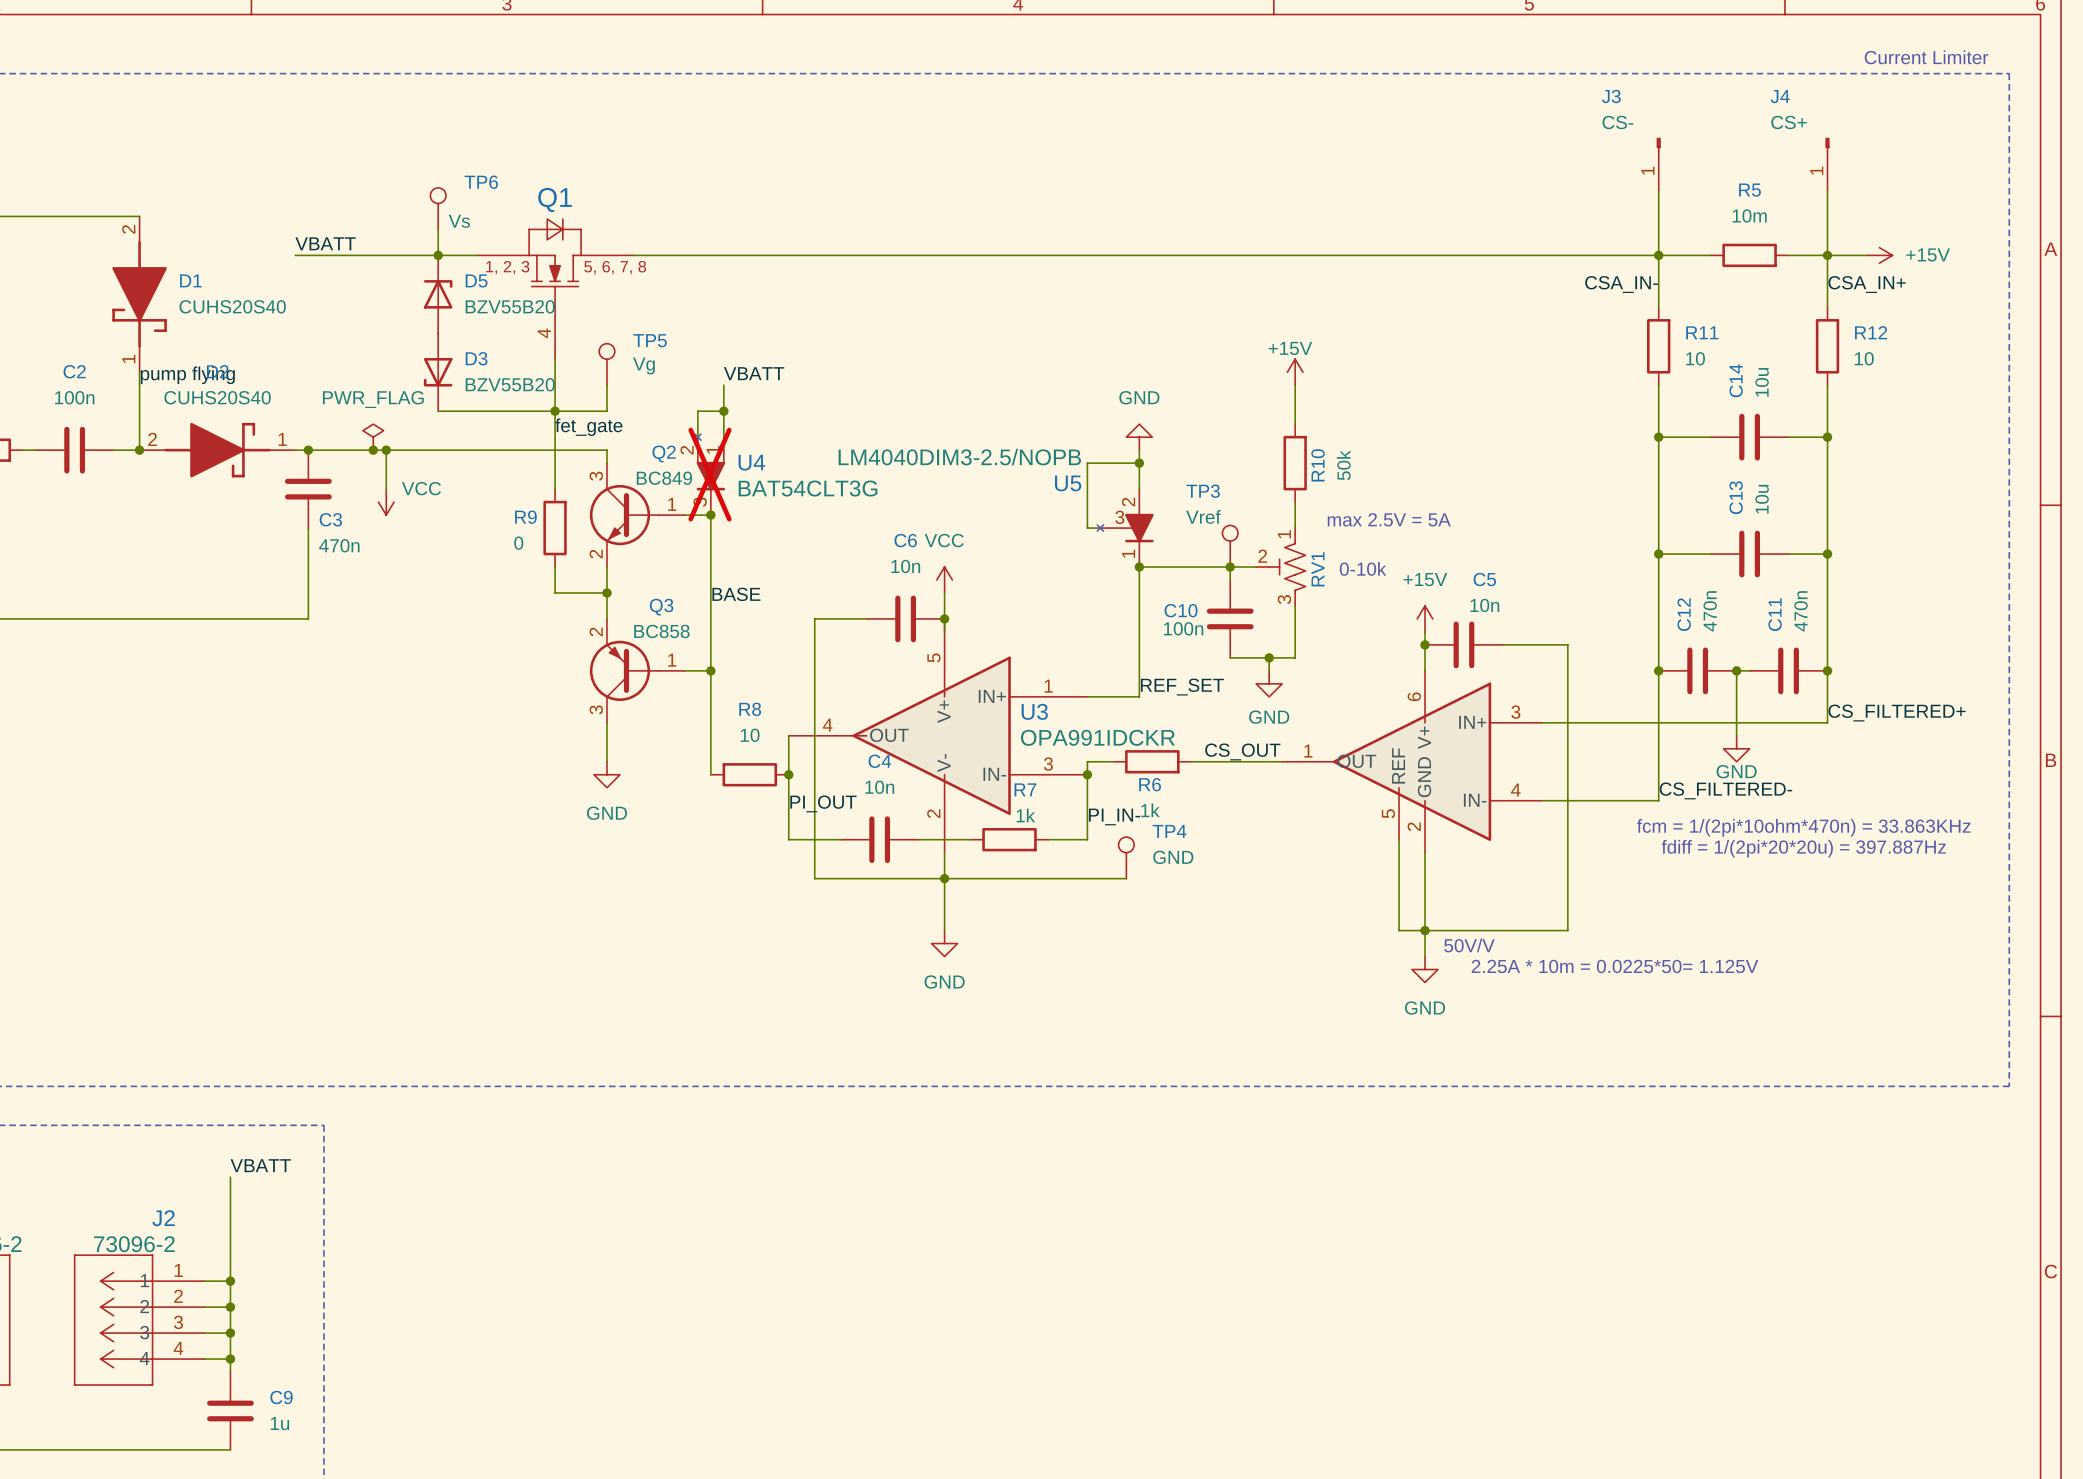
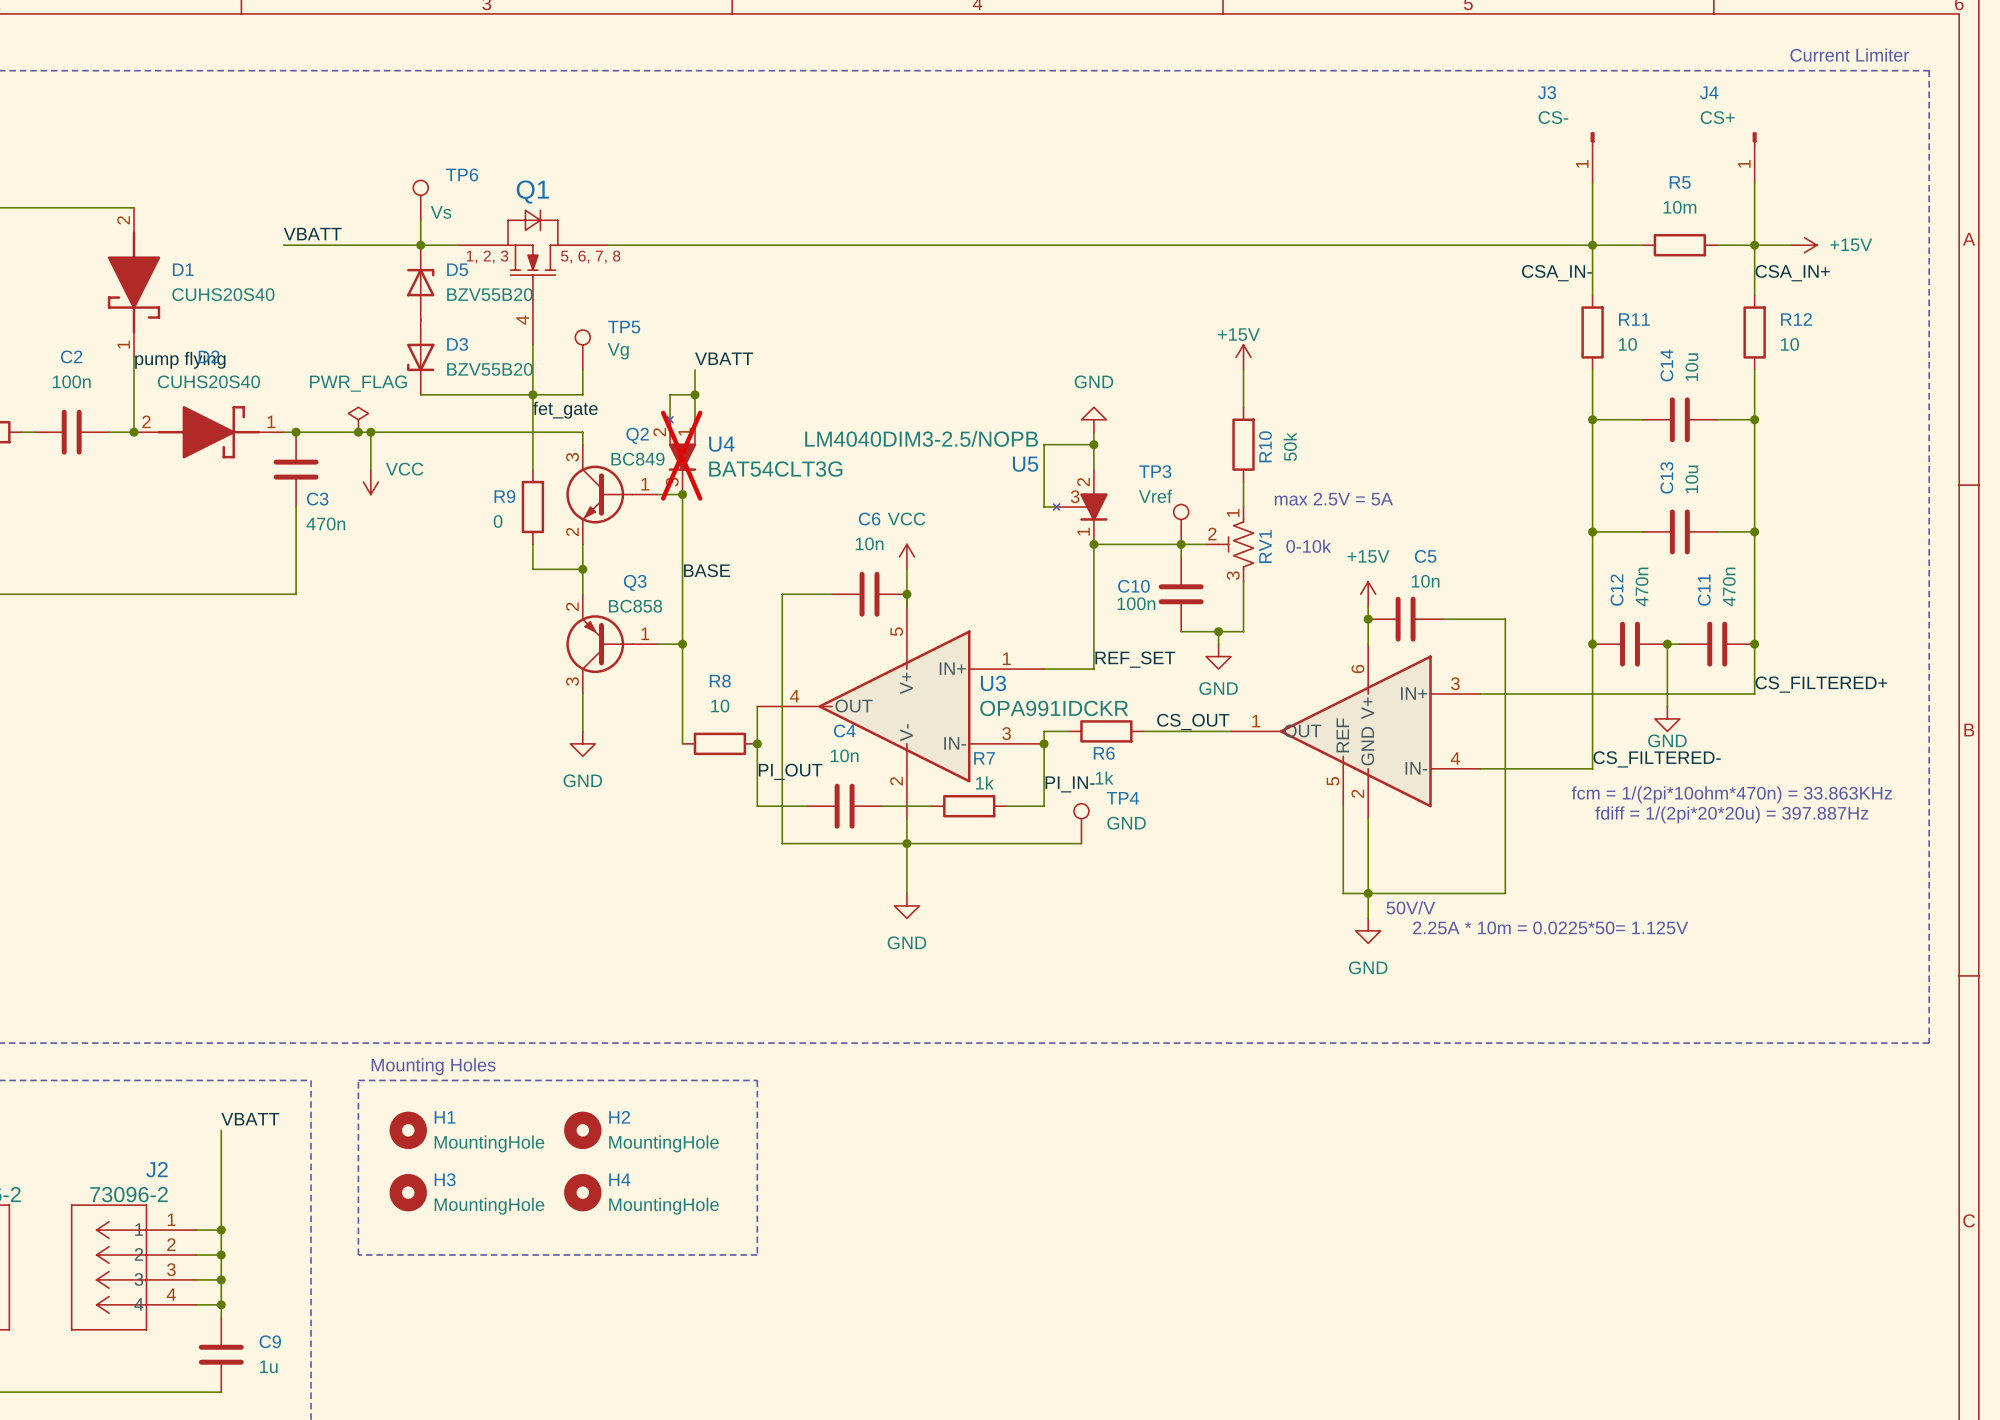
text: none -> Mounting Holes (433, 1066)
line: none -> (358, 1080) (757, 1080) (757, 1254) (358, 1254) (358, 1080)
H1: none -> MountingHole (408, 1130)
H2: none -> MountingHole (582, 1130)
H3: none -> MountingHole (408, 1192)
H4: none -> MountingHole (582, 1192)

